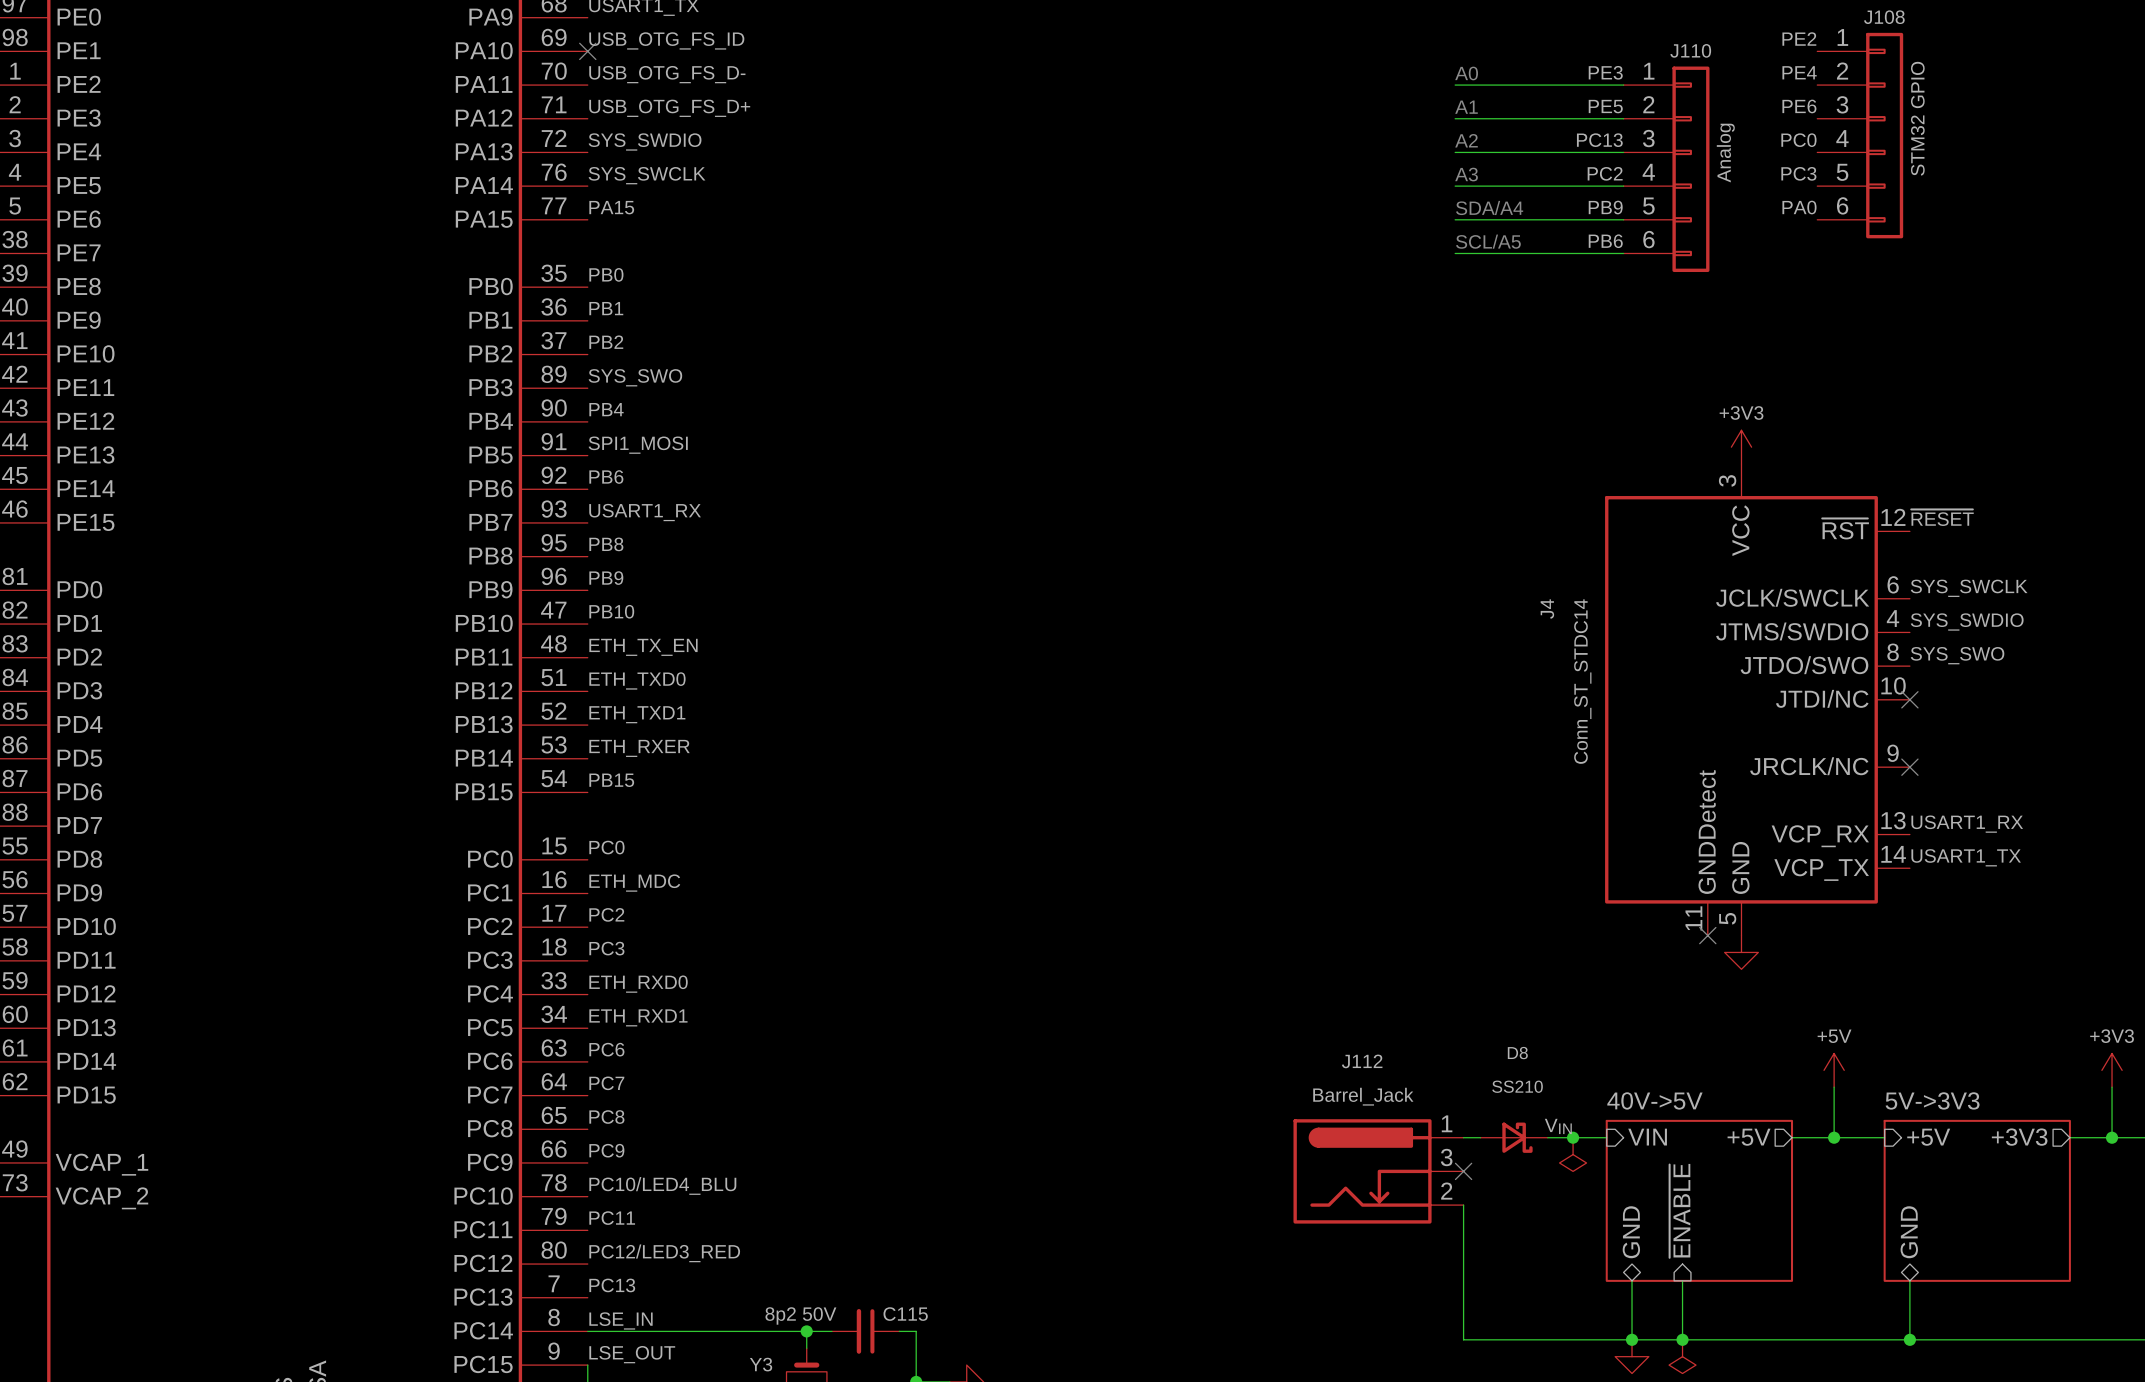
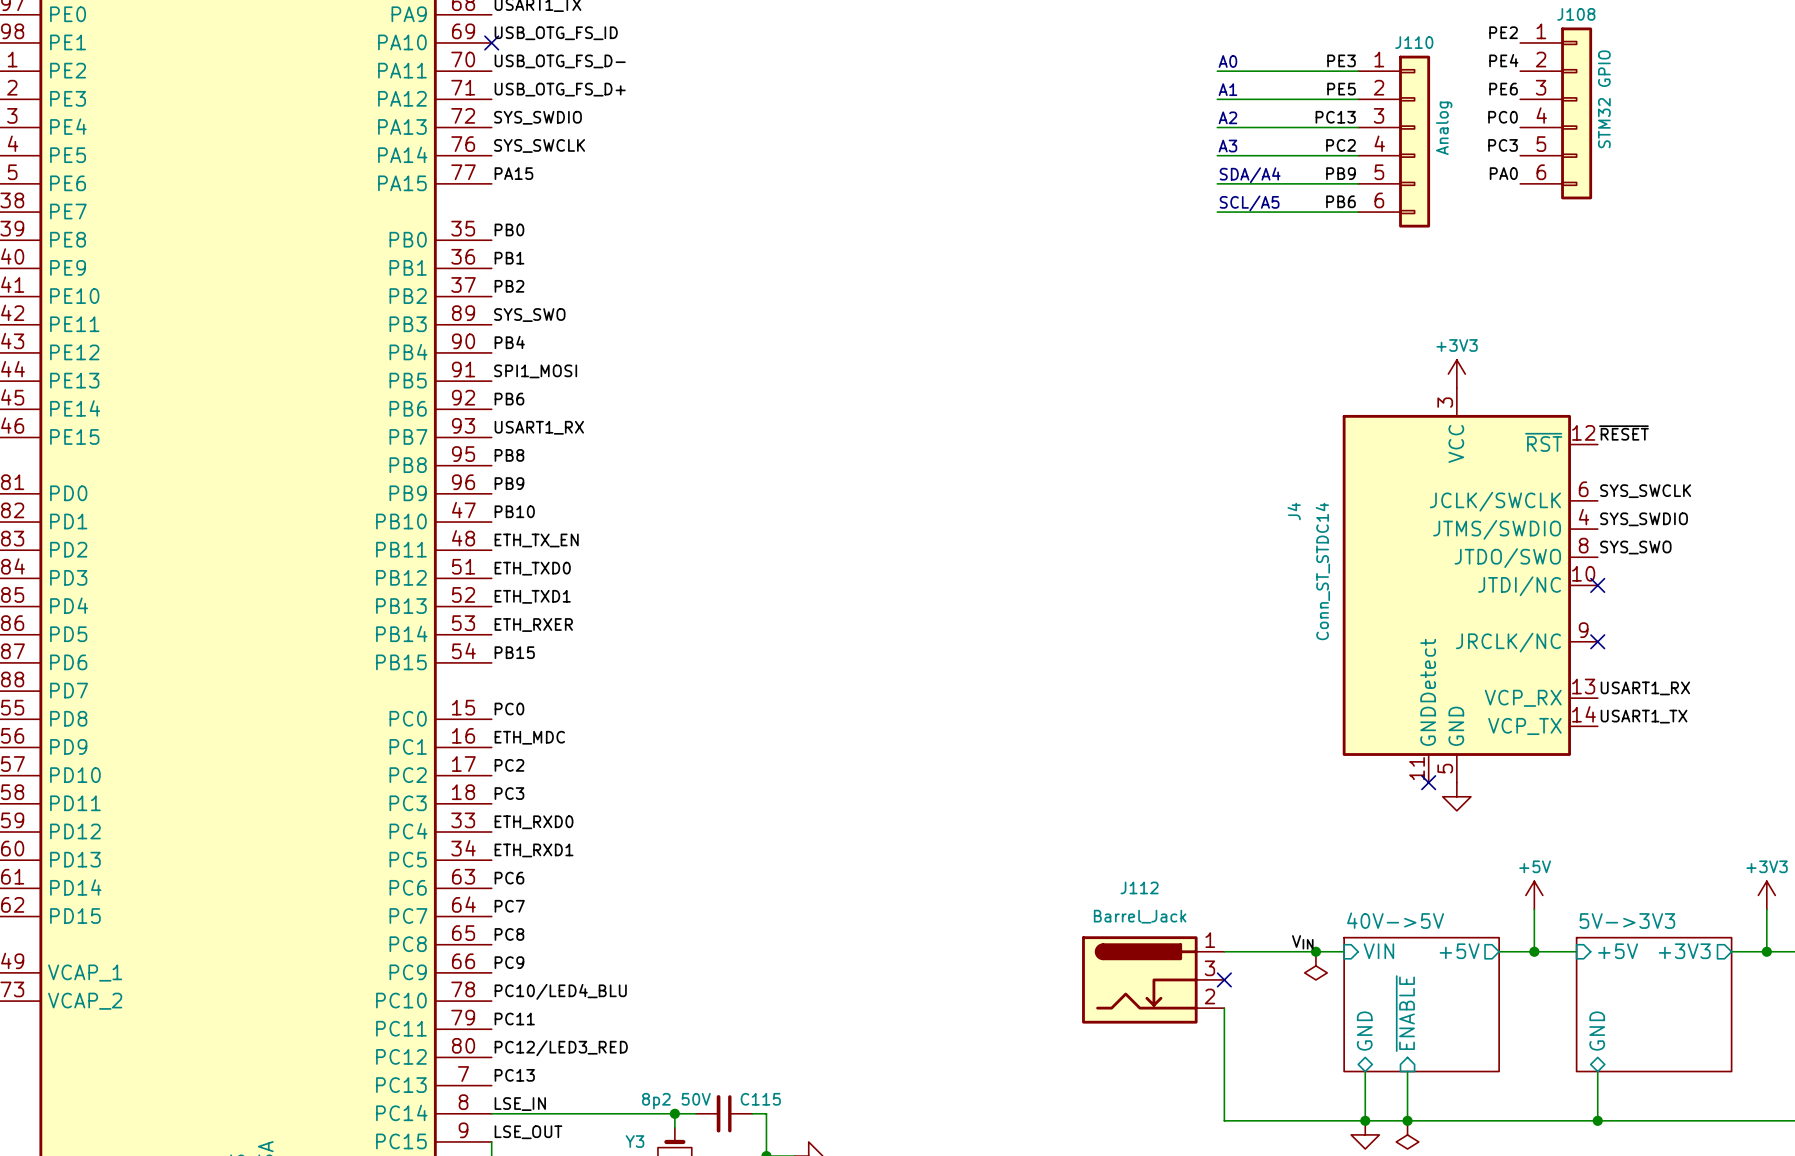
D8: SS210 (1514, 1137) -> none

